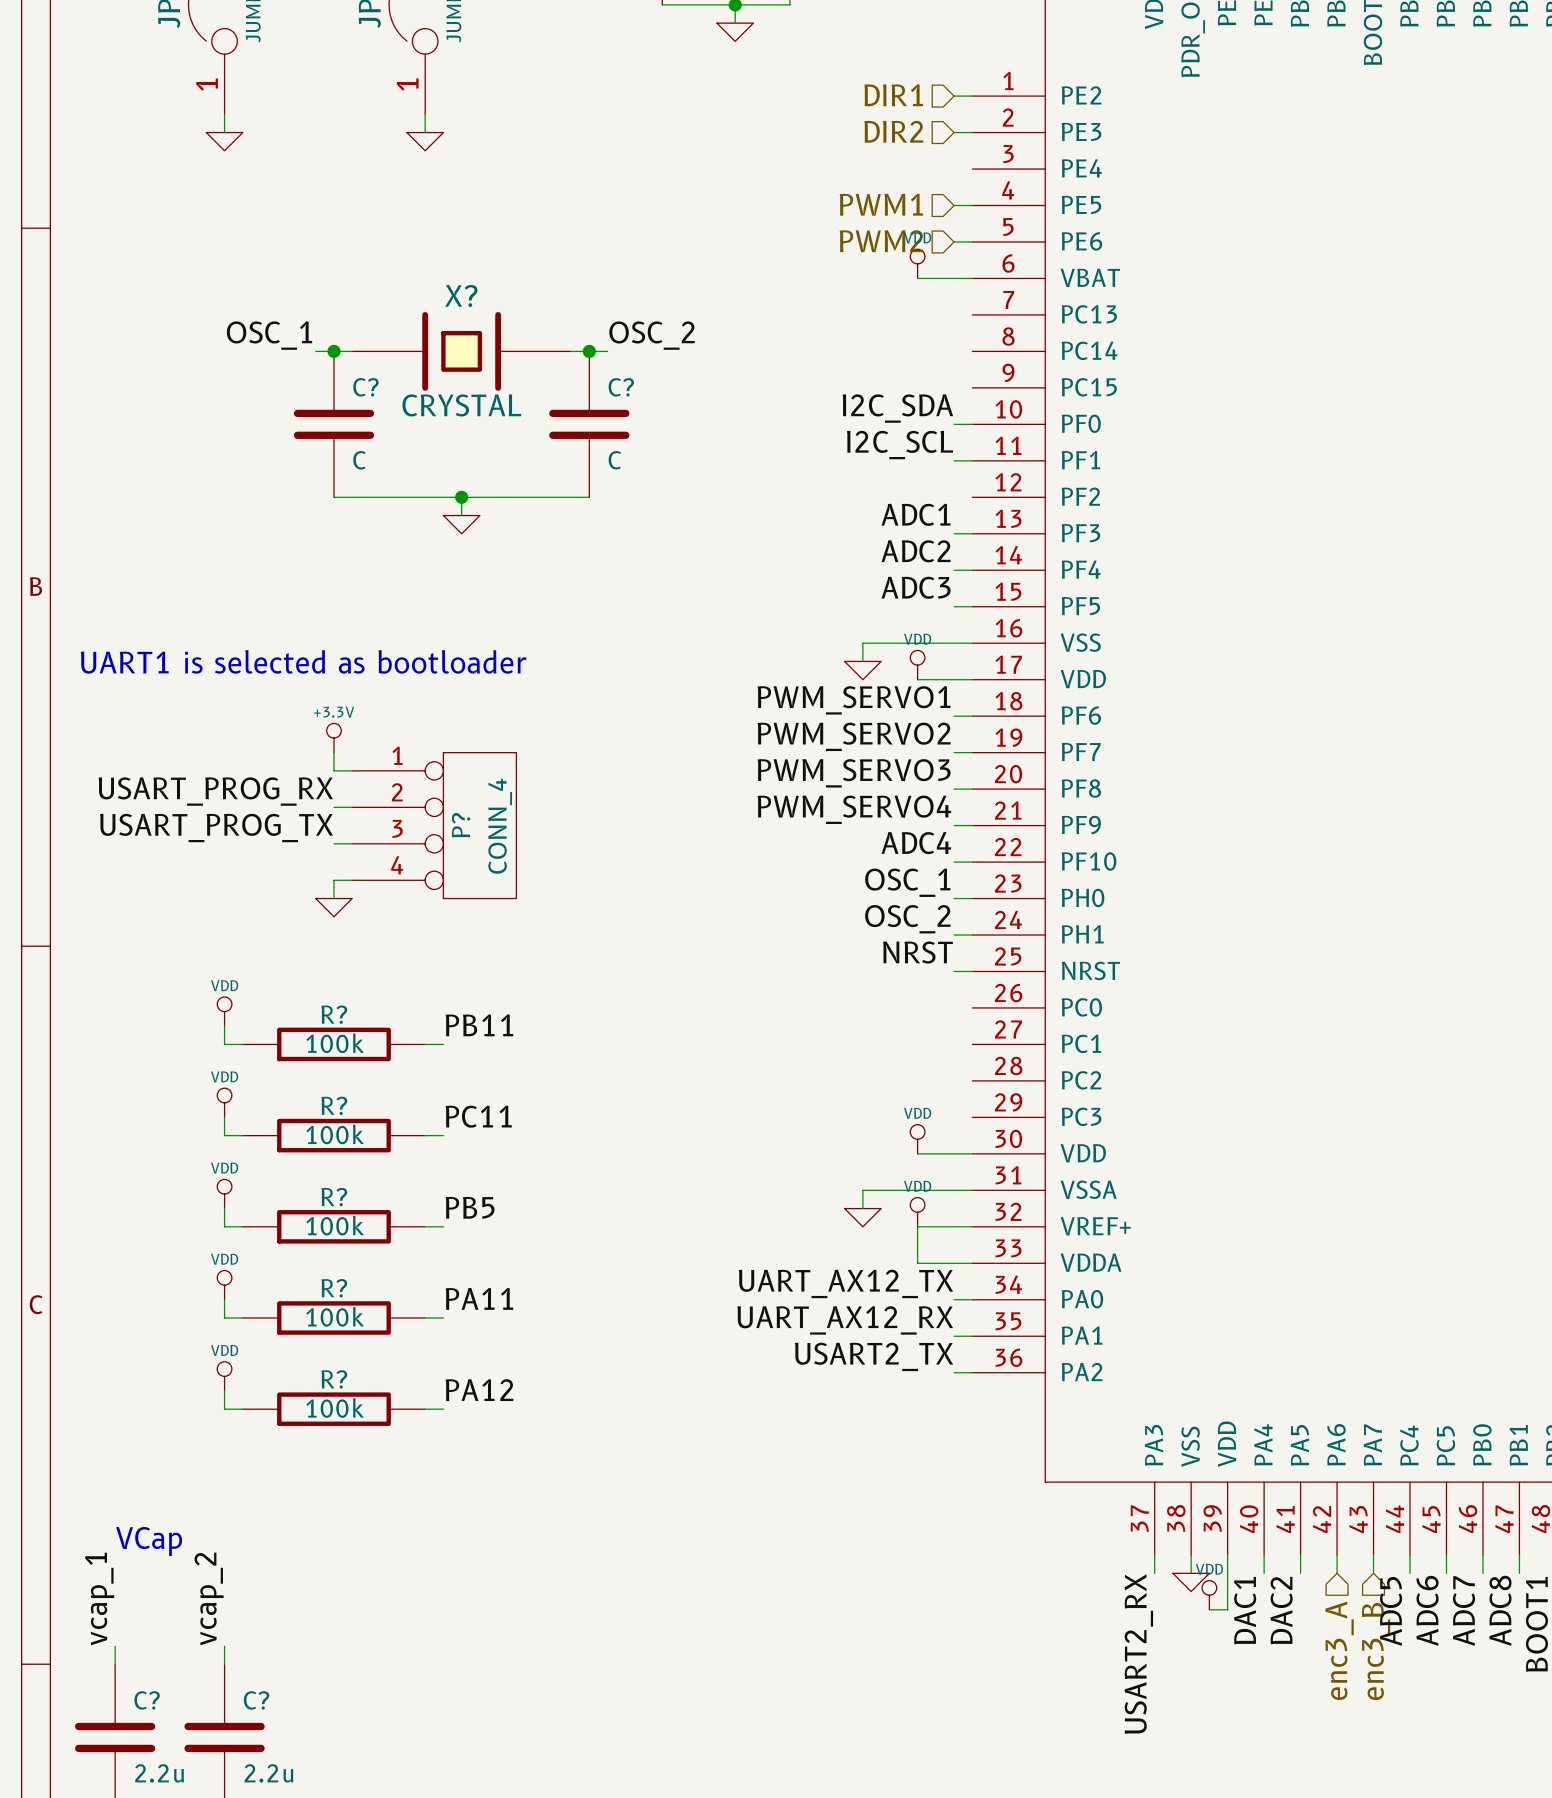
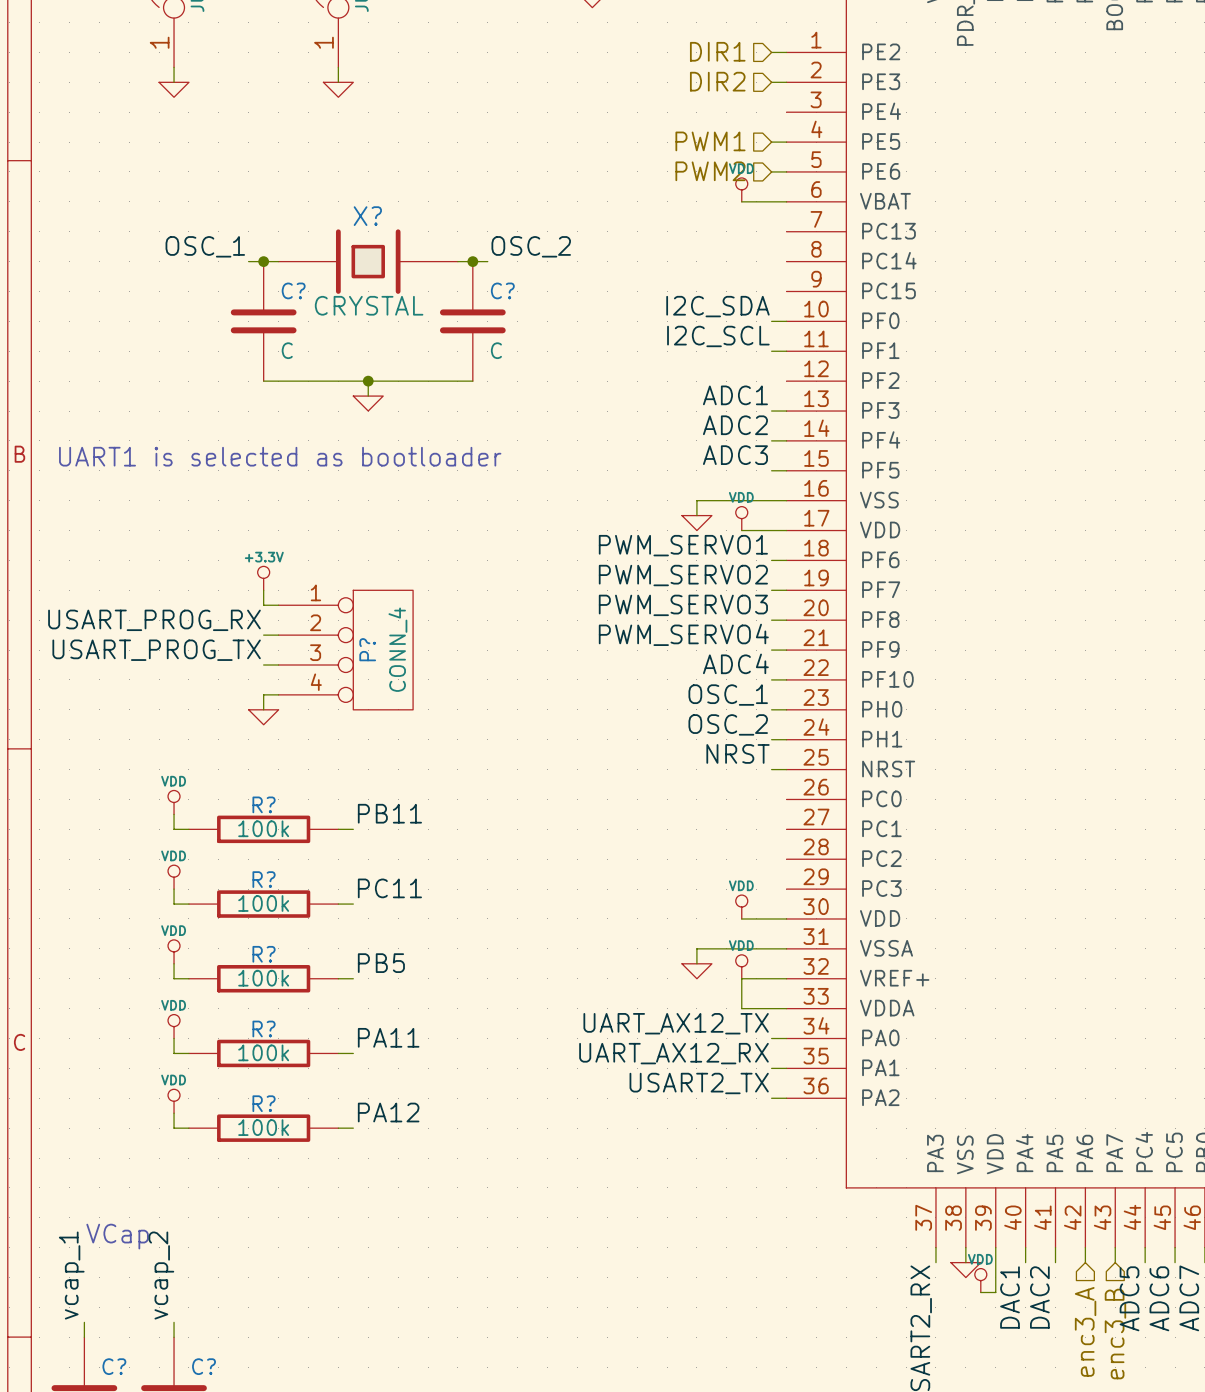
text position: UART1 is selected as bootloader (303, 661) -> UART1 is selected as bootloader (280, 456)

